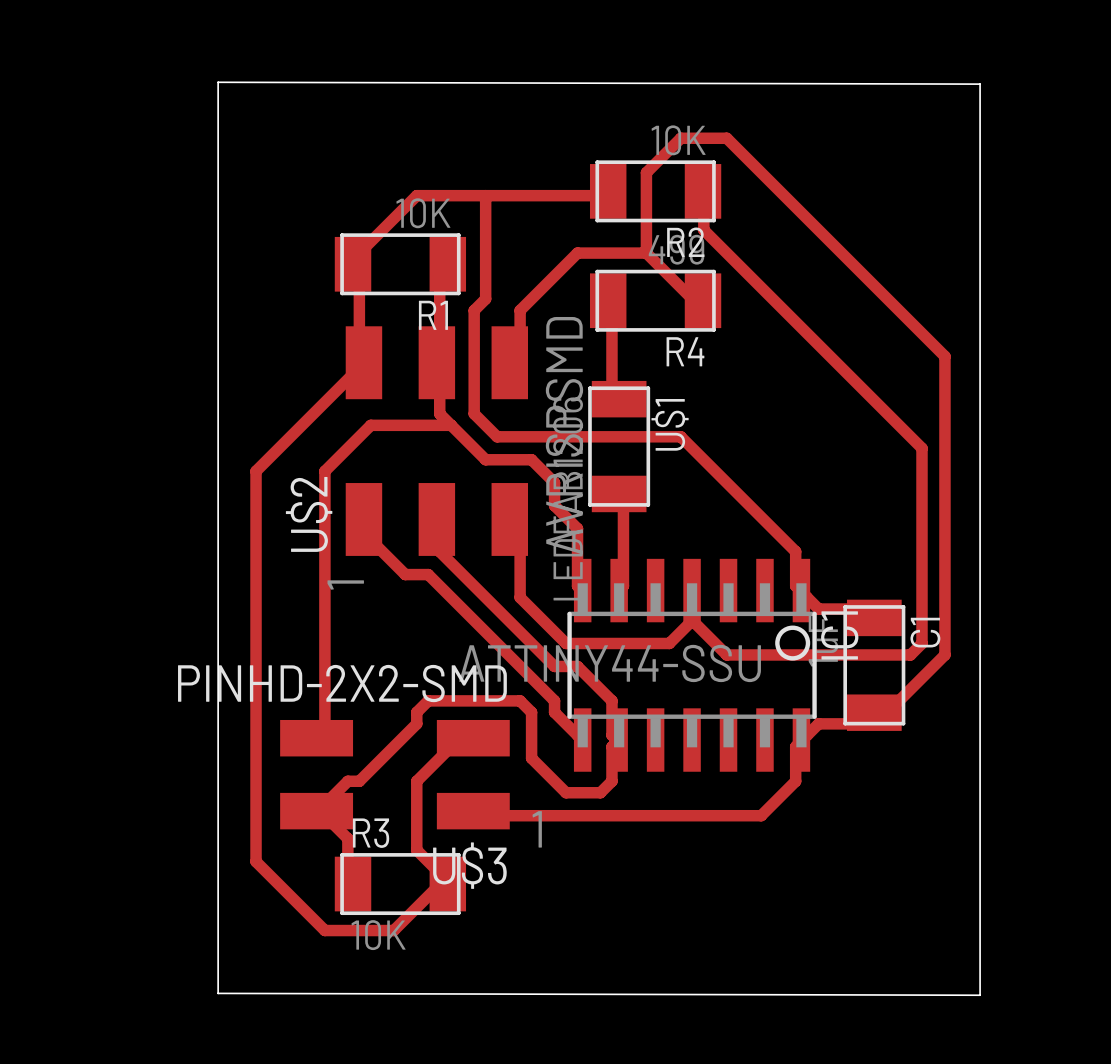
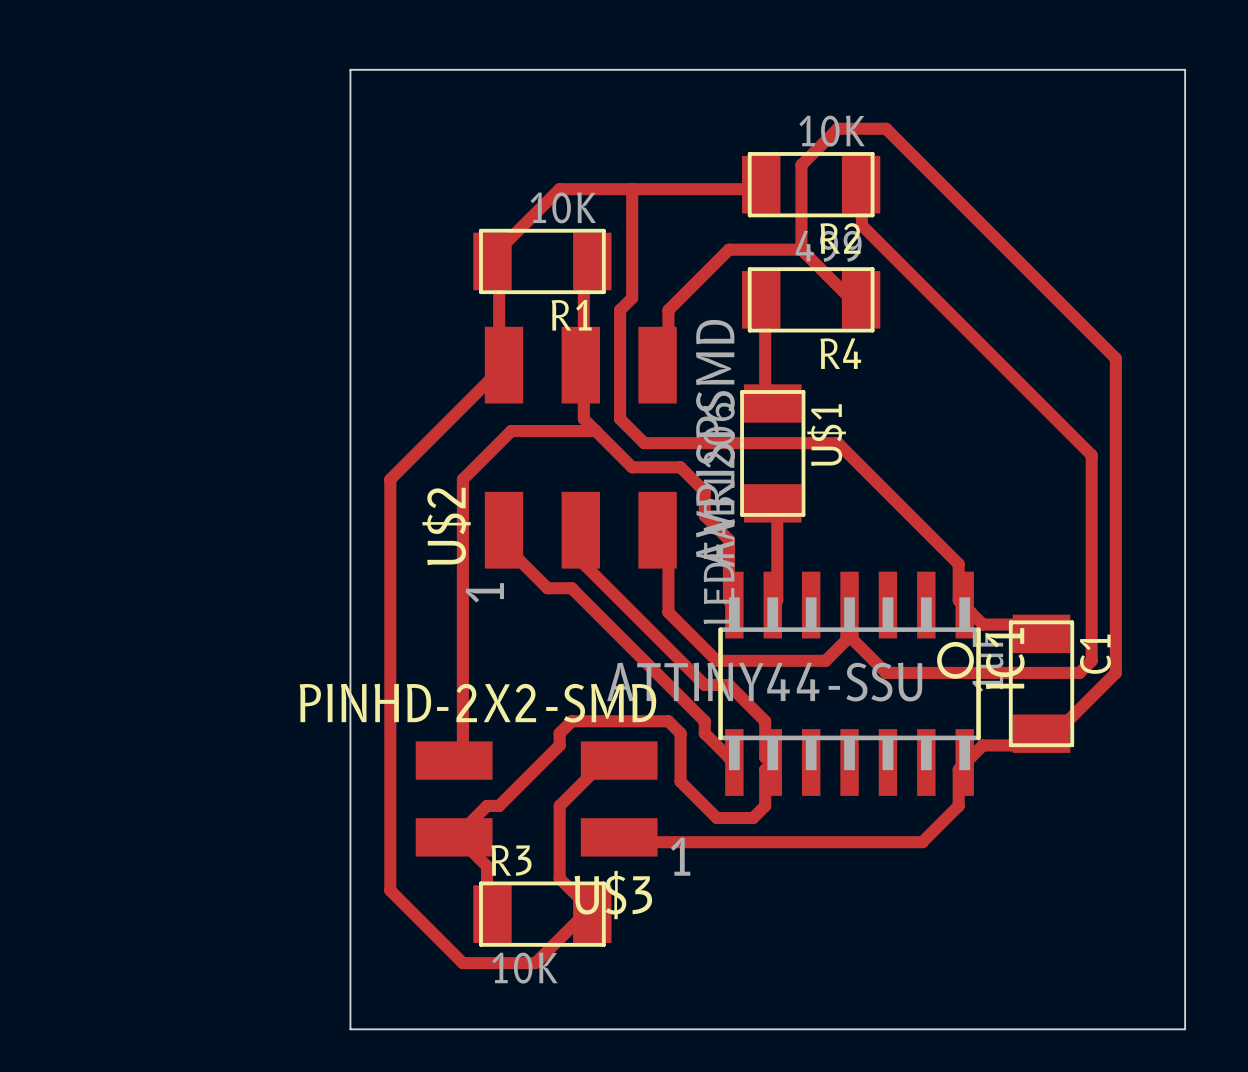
board edge: (218, 82) (980, 84) (980, 995) (218, 993) -> (350, 69) (1185, 69) (1185, 1029) (350, 1029)

